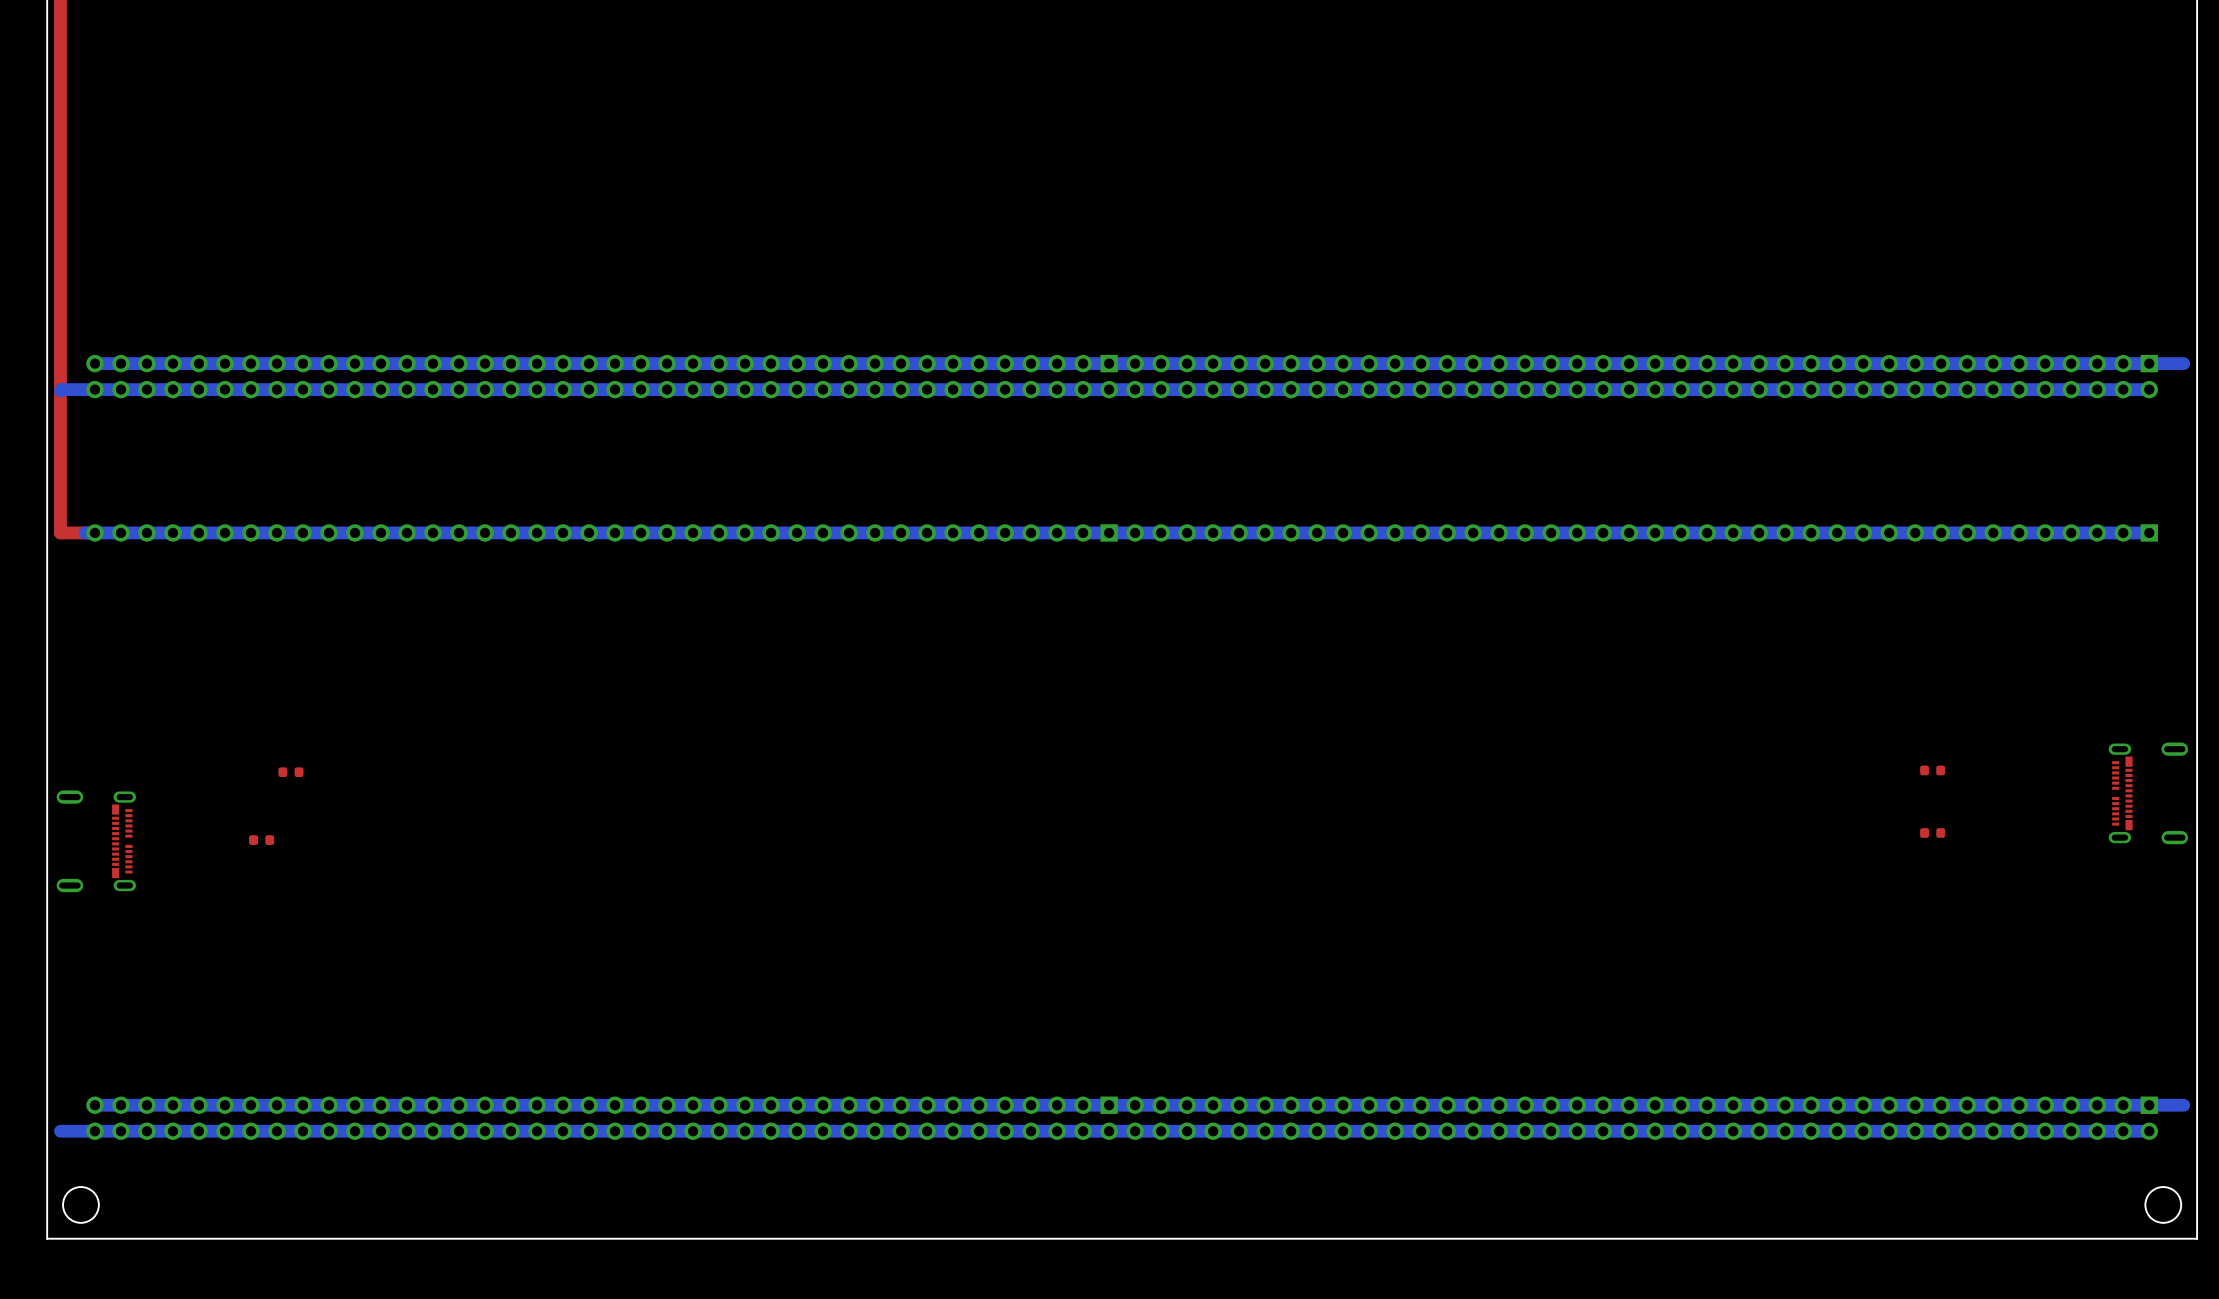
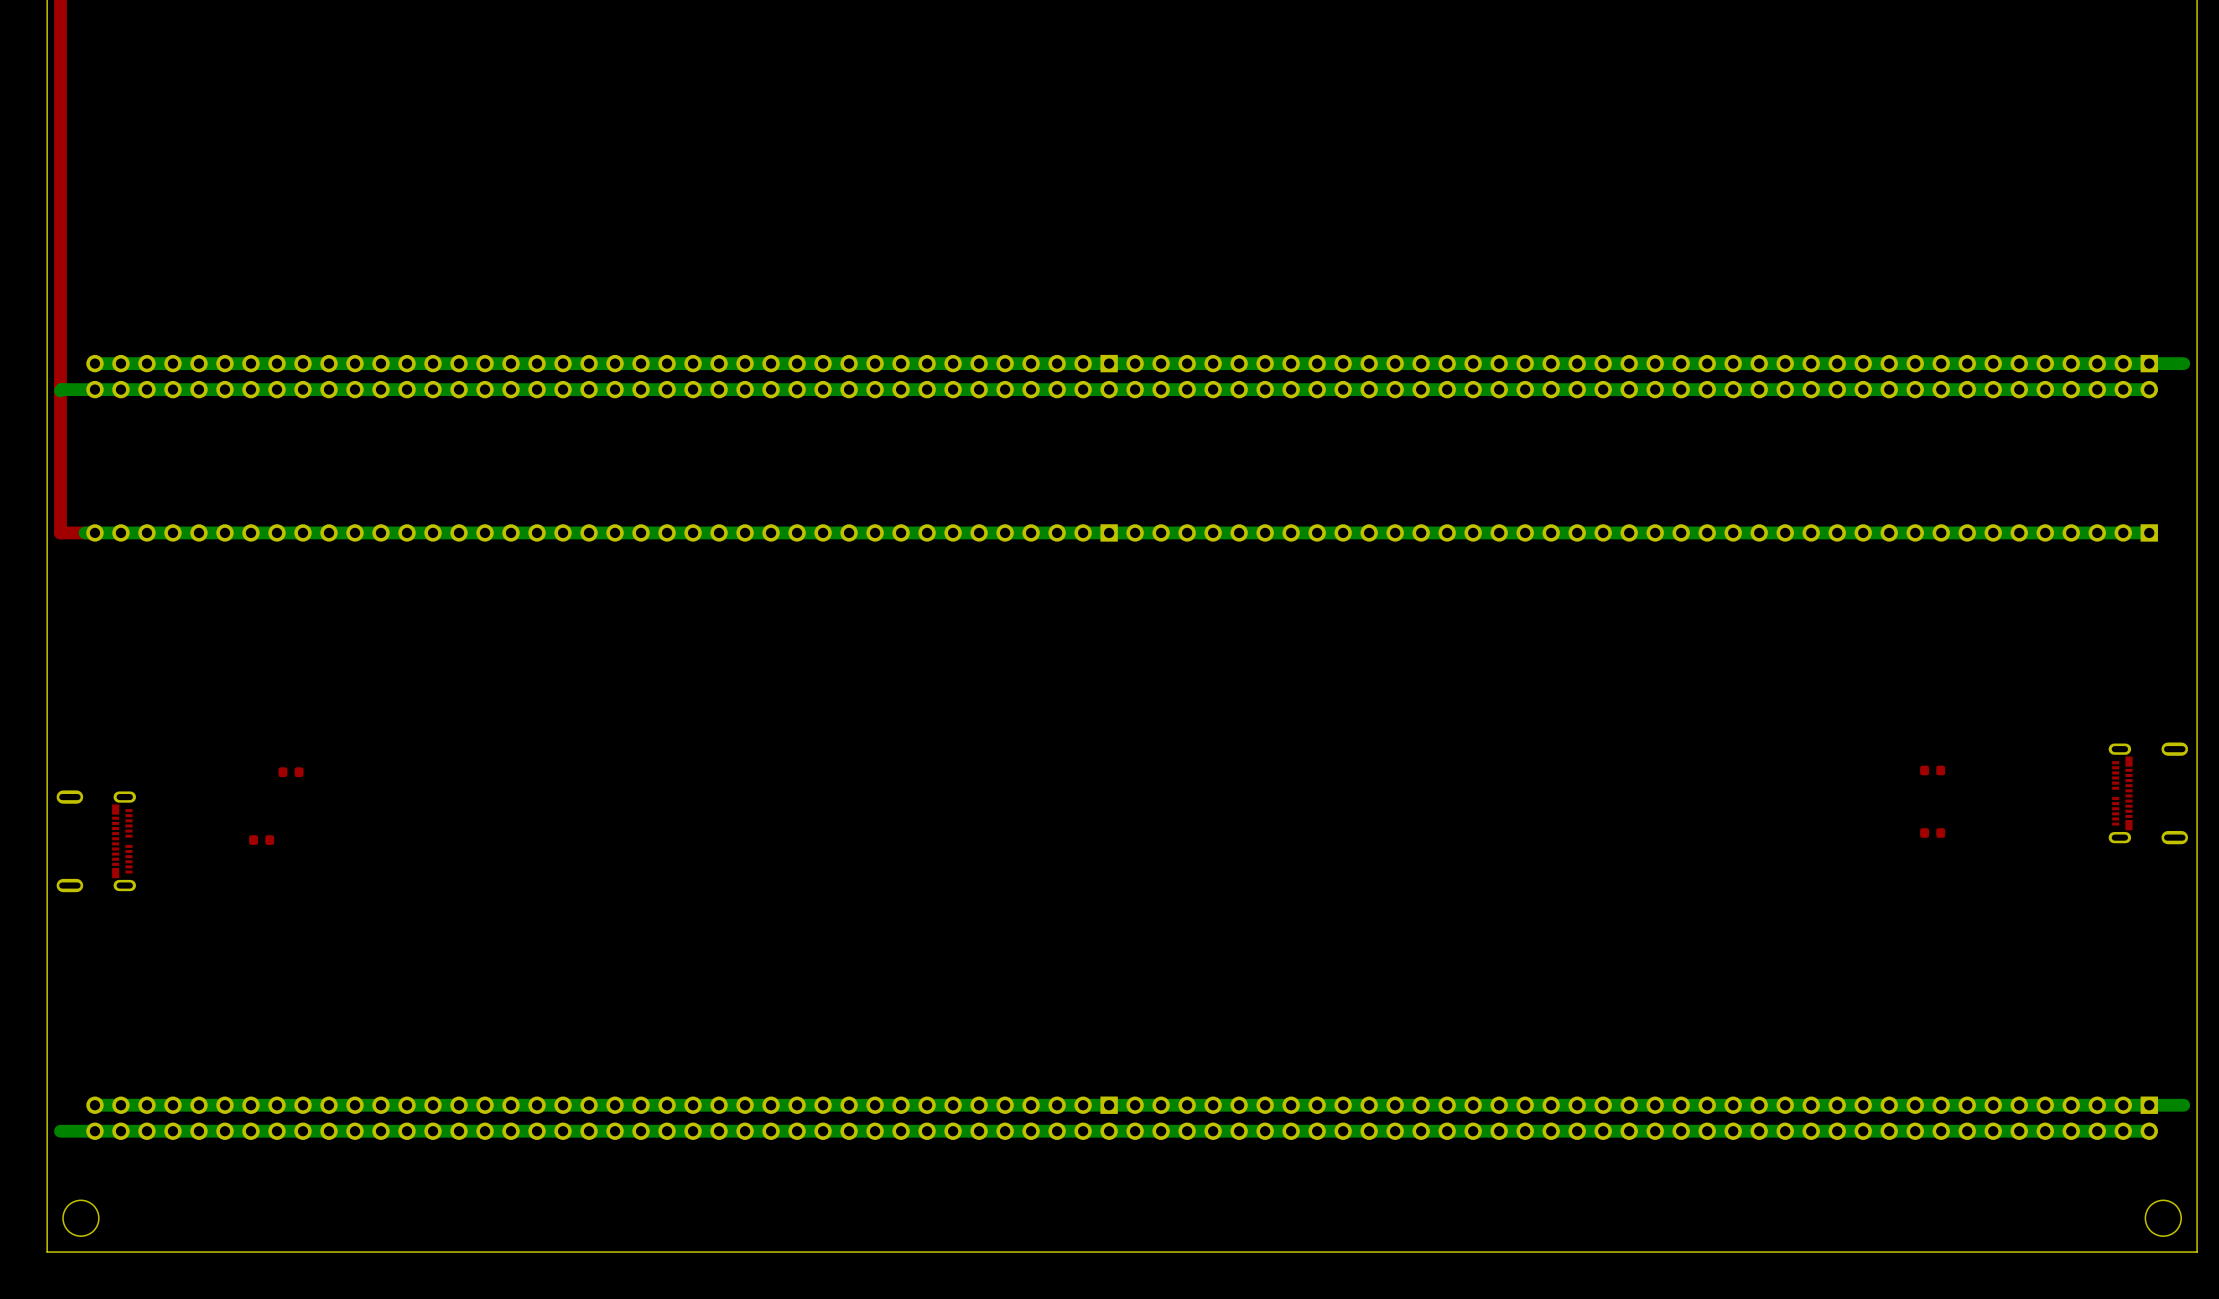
round board edge position: (80, 1204) -> (80, 1218)
round board edge position: (2163, 1204) -> (2163, 1218)
board edge: (2197, 1238) (47, 1238) -> (2197, 1238) (2197, 1252) (47, 1252) (47, 1238)

